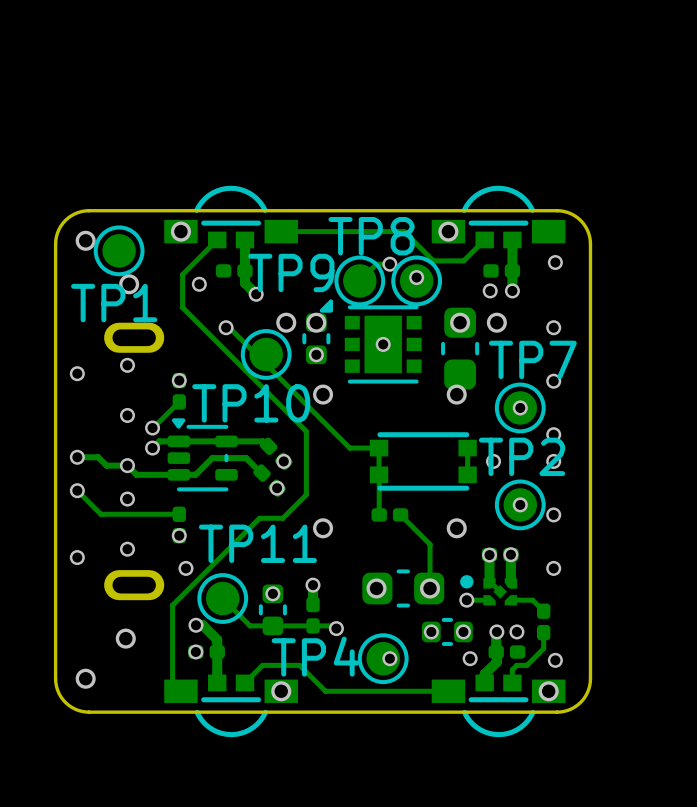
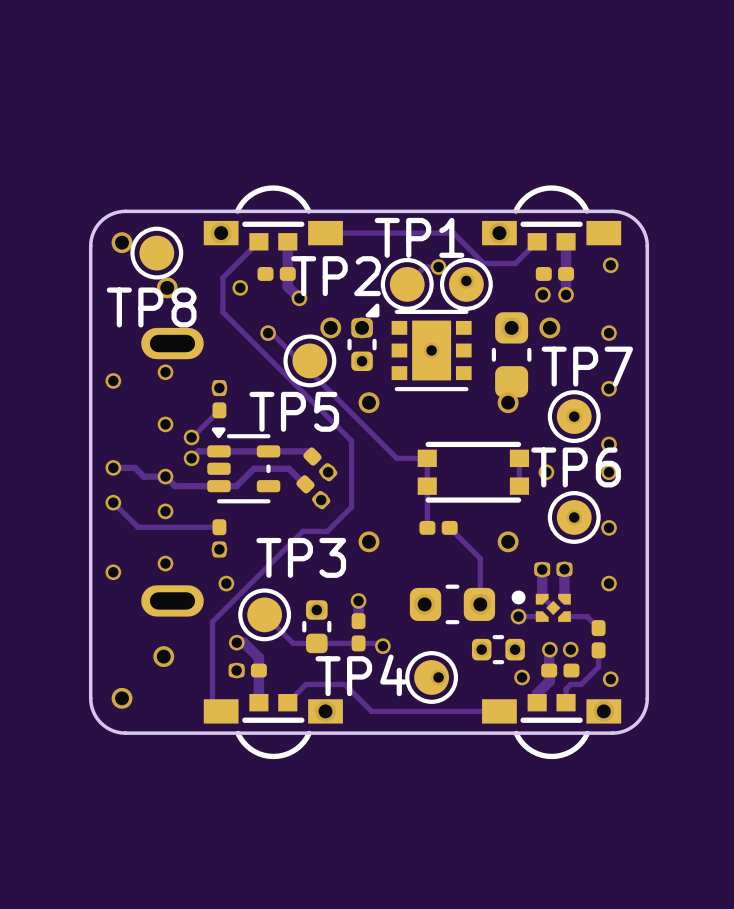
TP8 name: TP8 (371, 236) -> TP1 (419, 237)
TP9 name: TP9 (291, 272) -> TP2 (336, 276)
TP1 name: TP1 (114, 303) -> TP8 (151, 307)
TP10 name: TP10 (251, 403) -> TP5 (294, 411)
TP2 name: TP2 (522, 456) -> TP6 (576, 467)
TP11 name: TP11 (257, 543) -> TP3 (301, 557)

